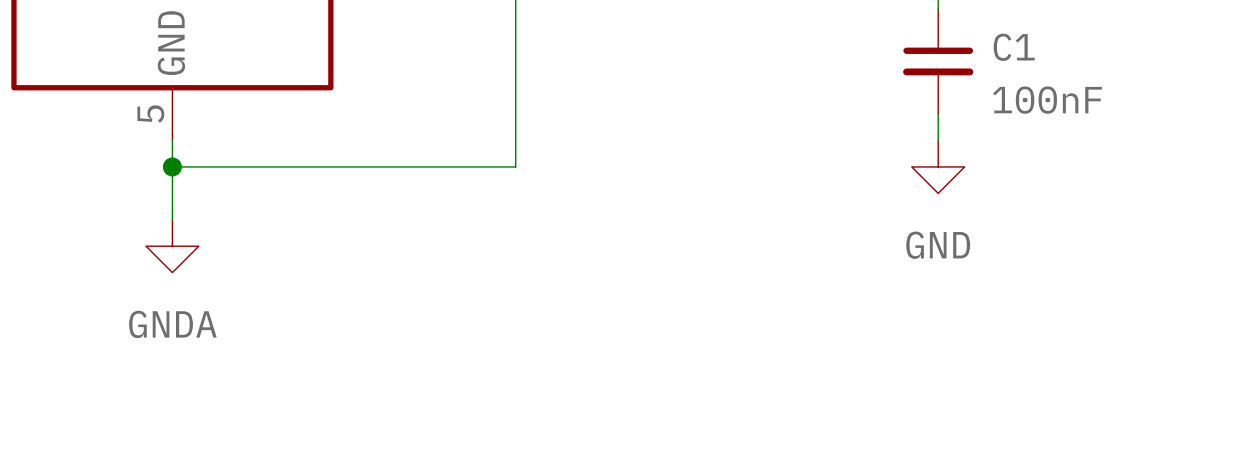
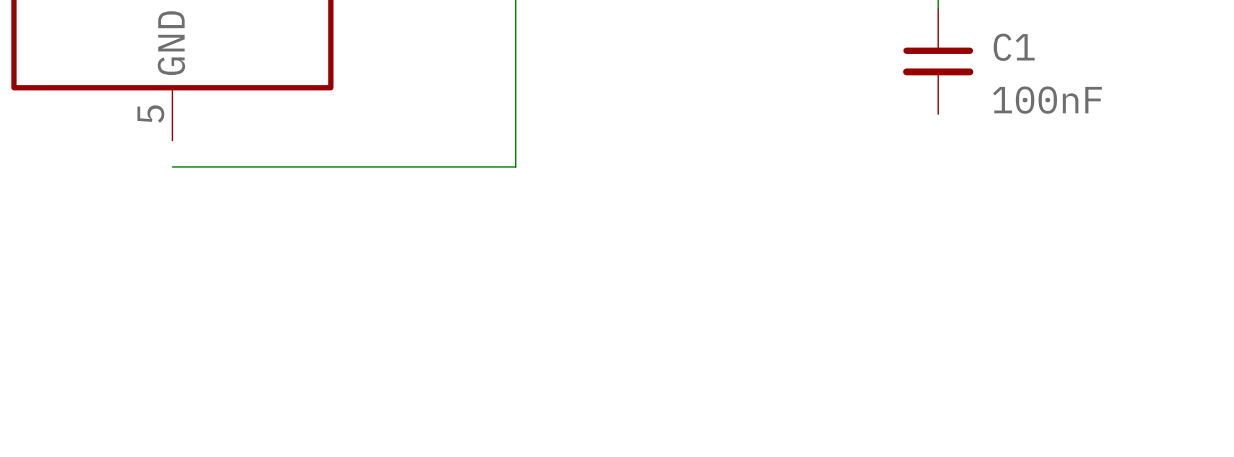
wire: (938, 114) (938, 140) -> none
wire: (172, 140) (172, 219) -> none
junction: (172, 166) -> none
power symbol: GND (938, 166) -> none
power symbol: GNDA (172, 246) -> none

